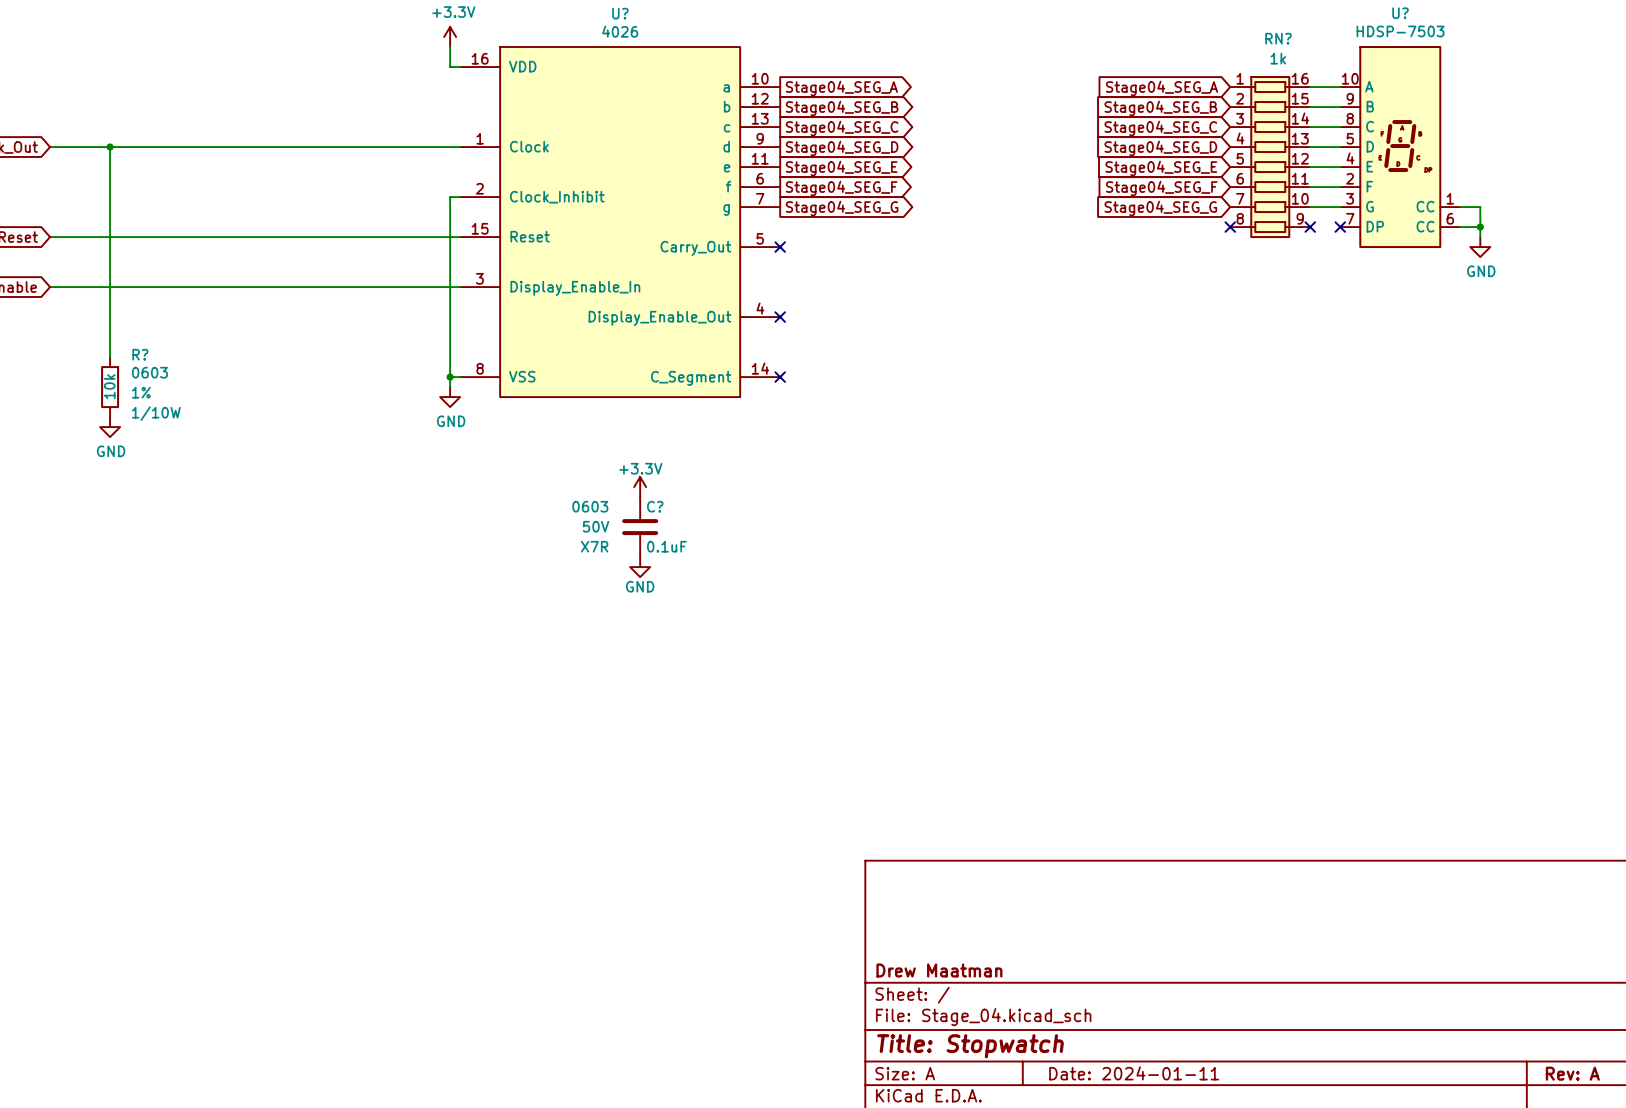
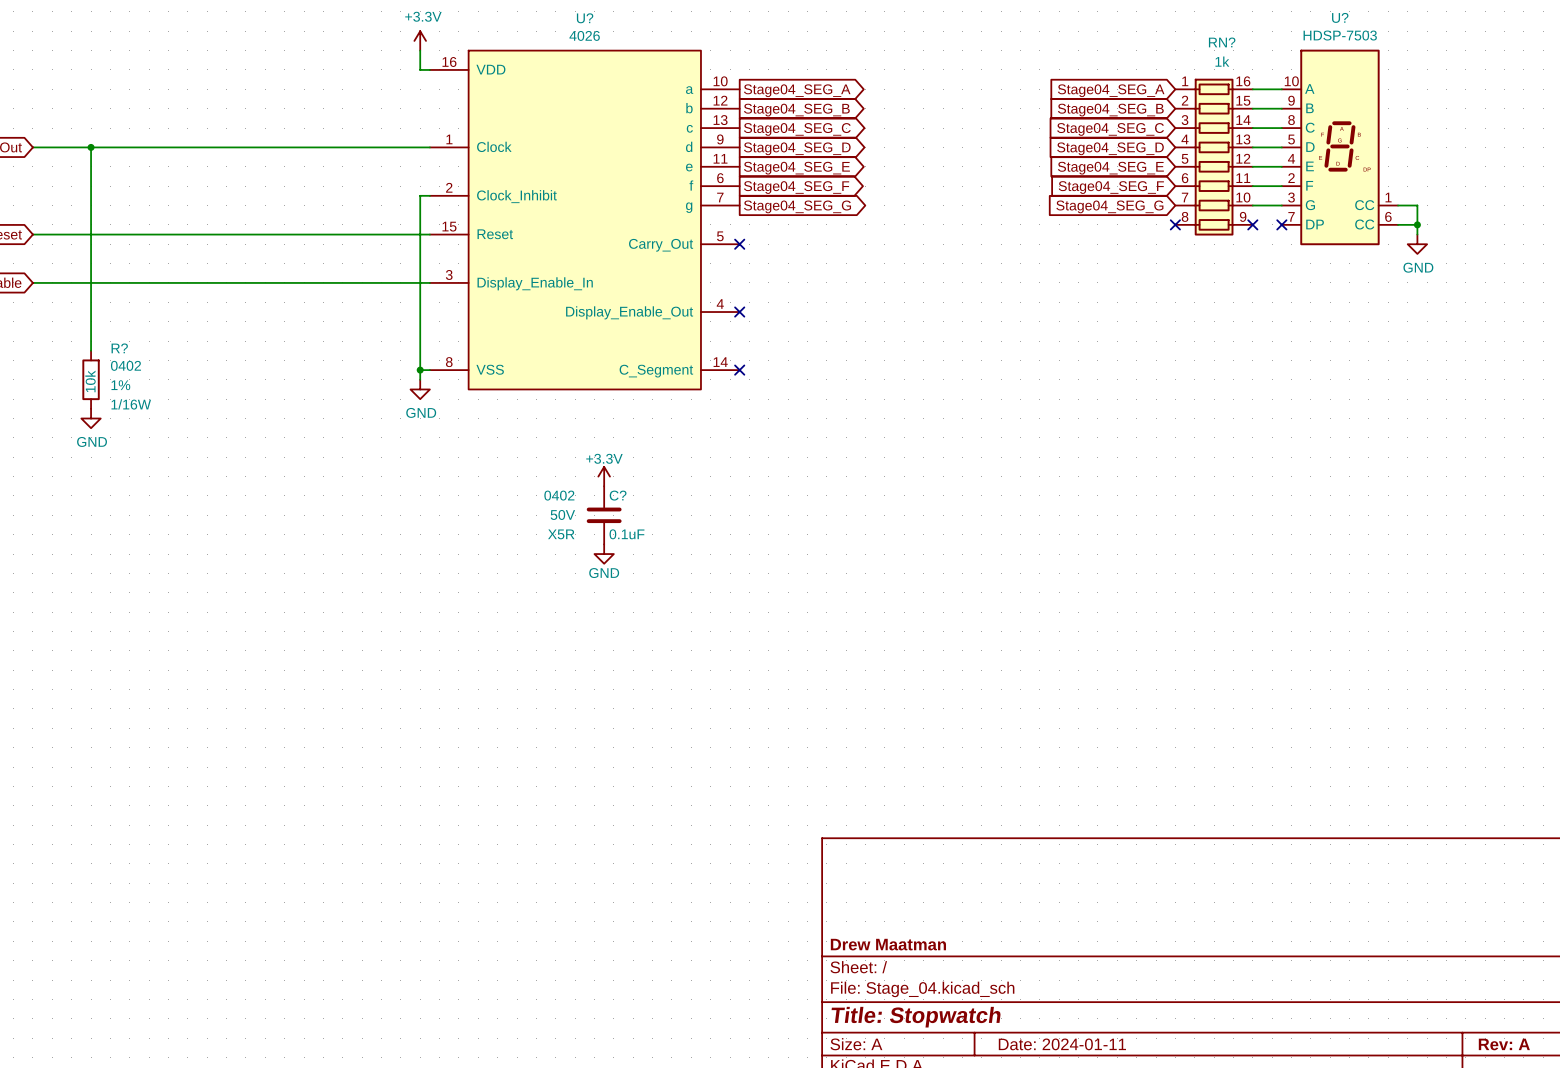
R? text: 0603 (149, 372) -> 0402 (125, 365)
R? text: 1/10W (156, 413) -> 1/16W (131, 404)
C? text: 0603 (590, 506) -> 0402 (559, 495)
C? text: X7R (594, 546) -> X5R (561, 534)

